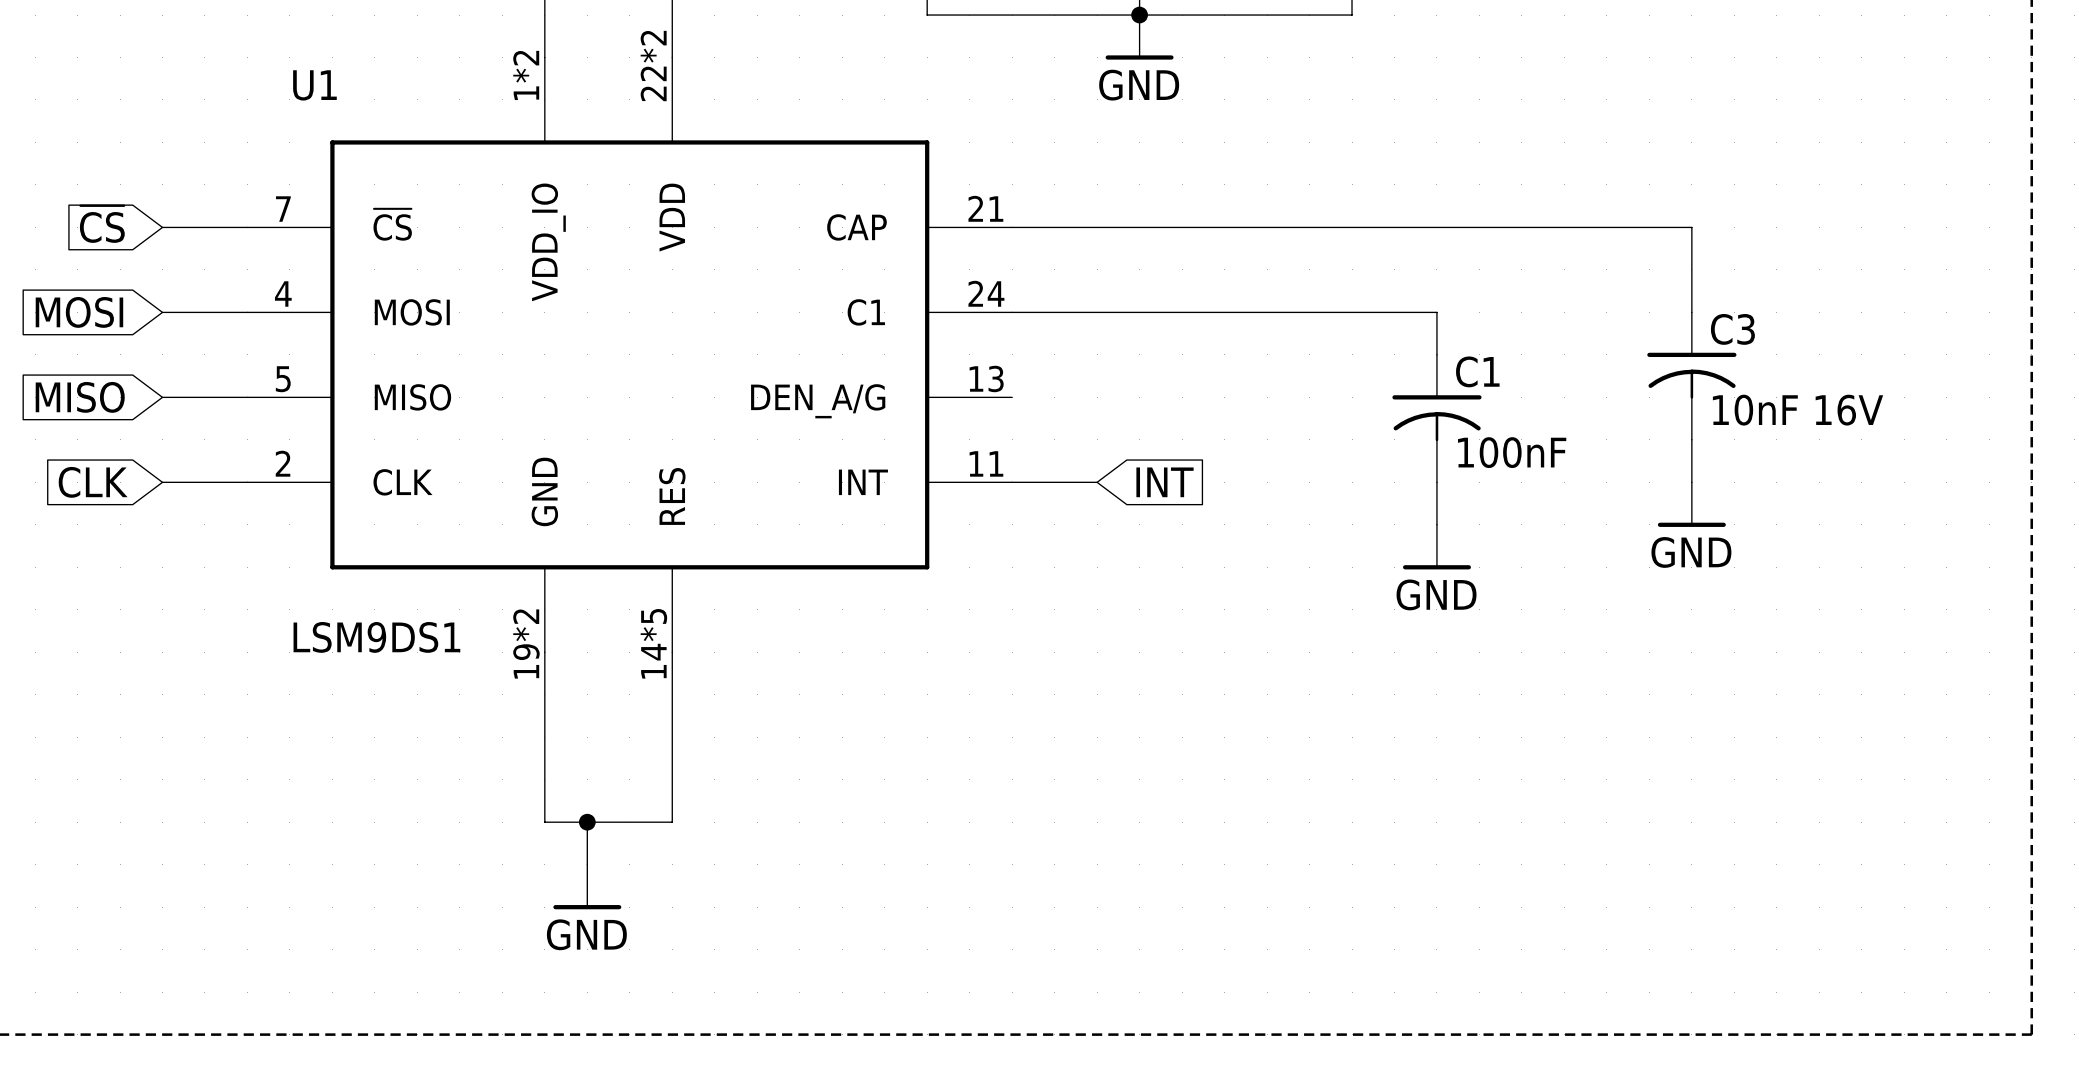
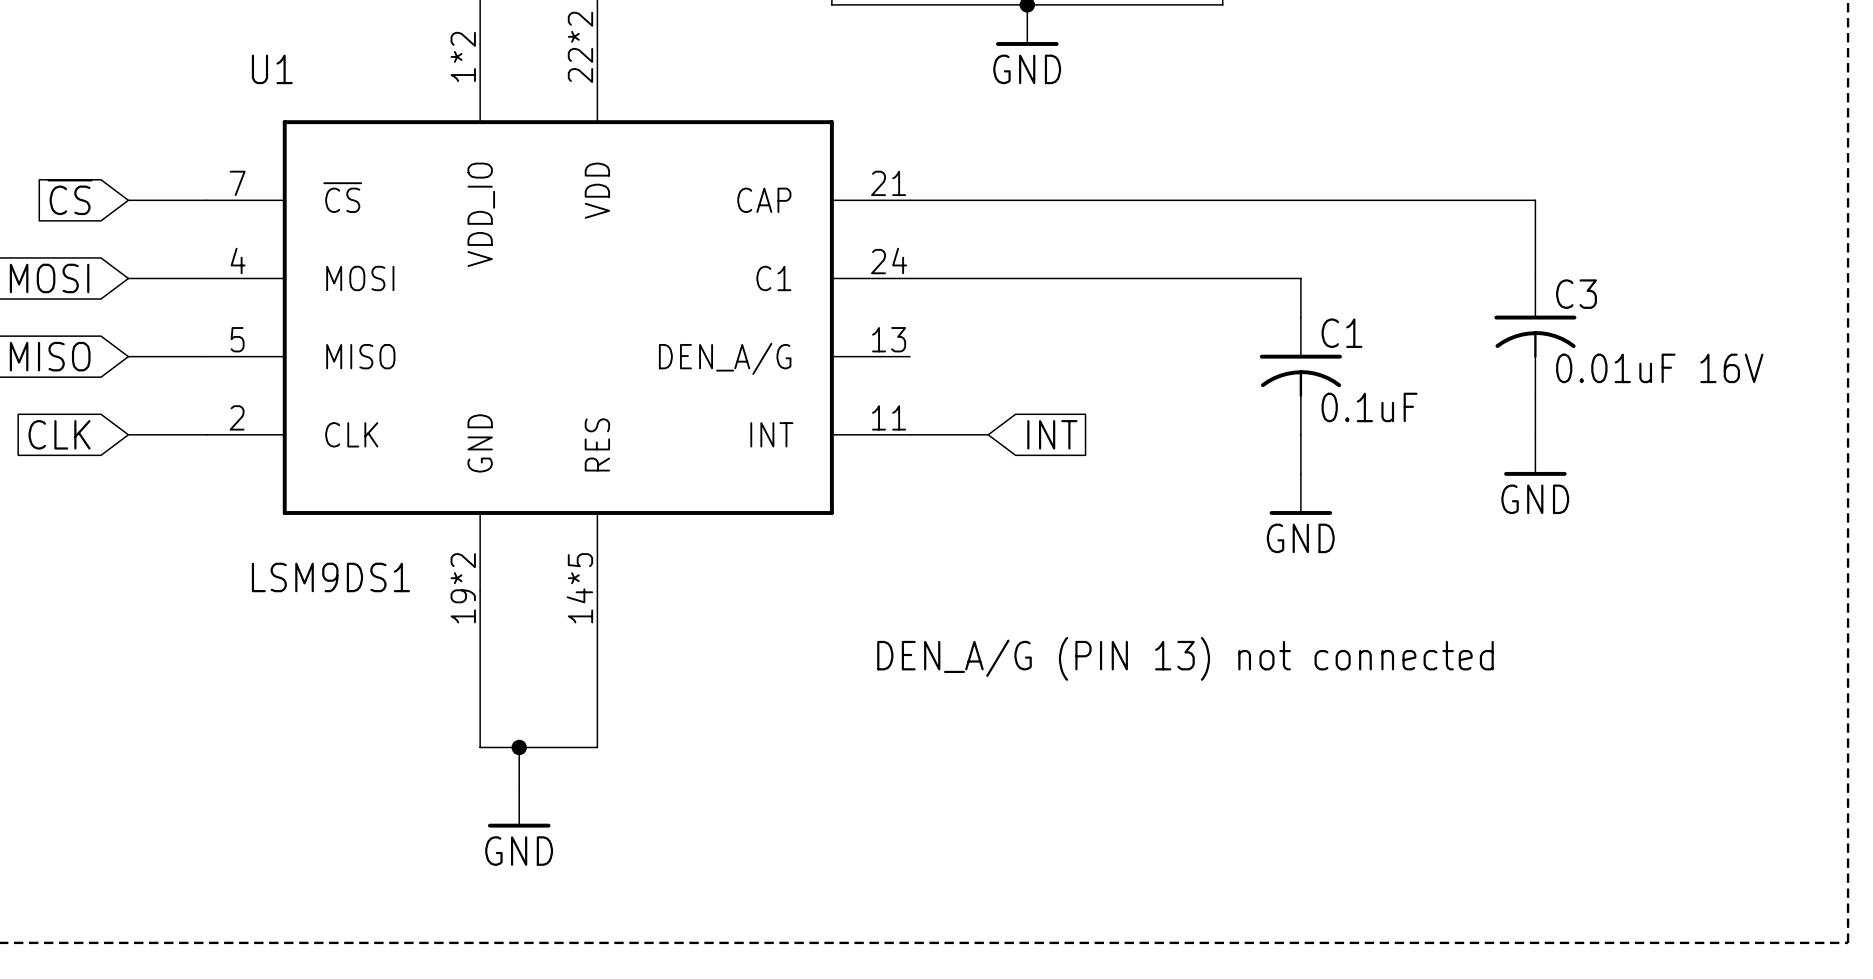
C3 value: 10nF 16V (1798, 410) -> 0.01uF 16V (1659, 368)
C1 value: 100nF (1512, 452) -> 0.1uF (1369, 407)
text: none -> DEN_A/G (PIN 13) not connected (1185, 658)

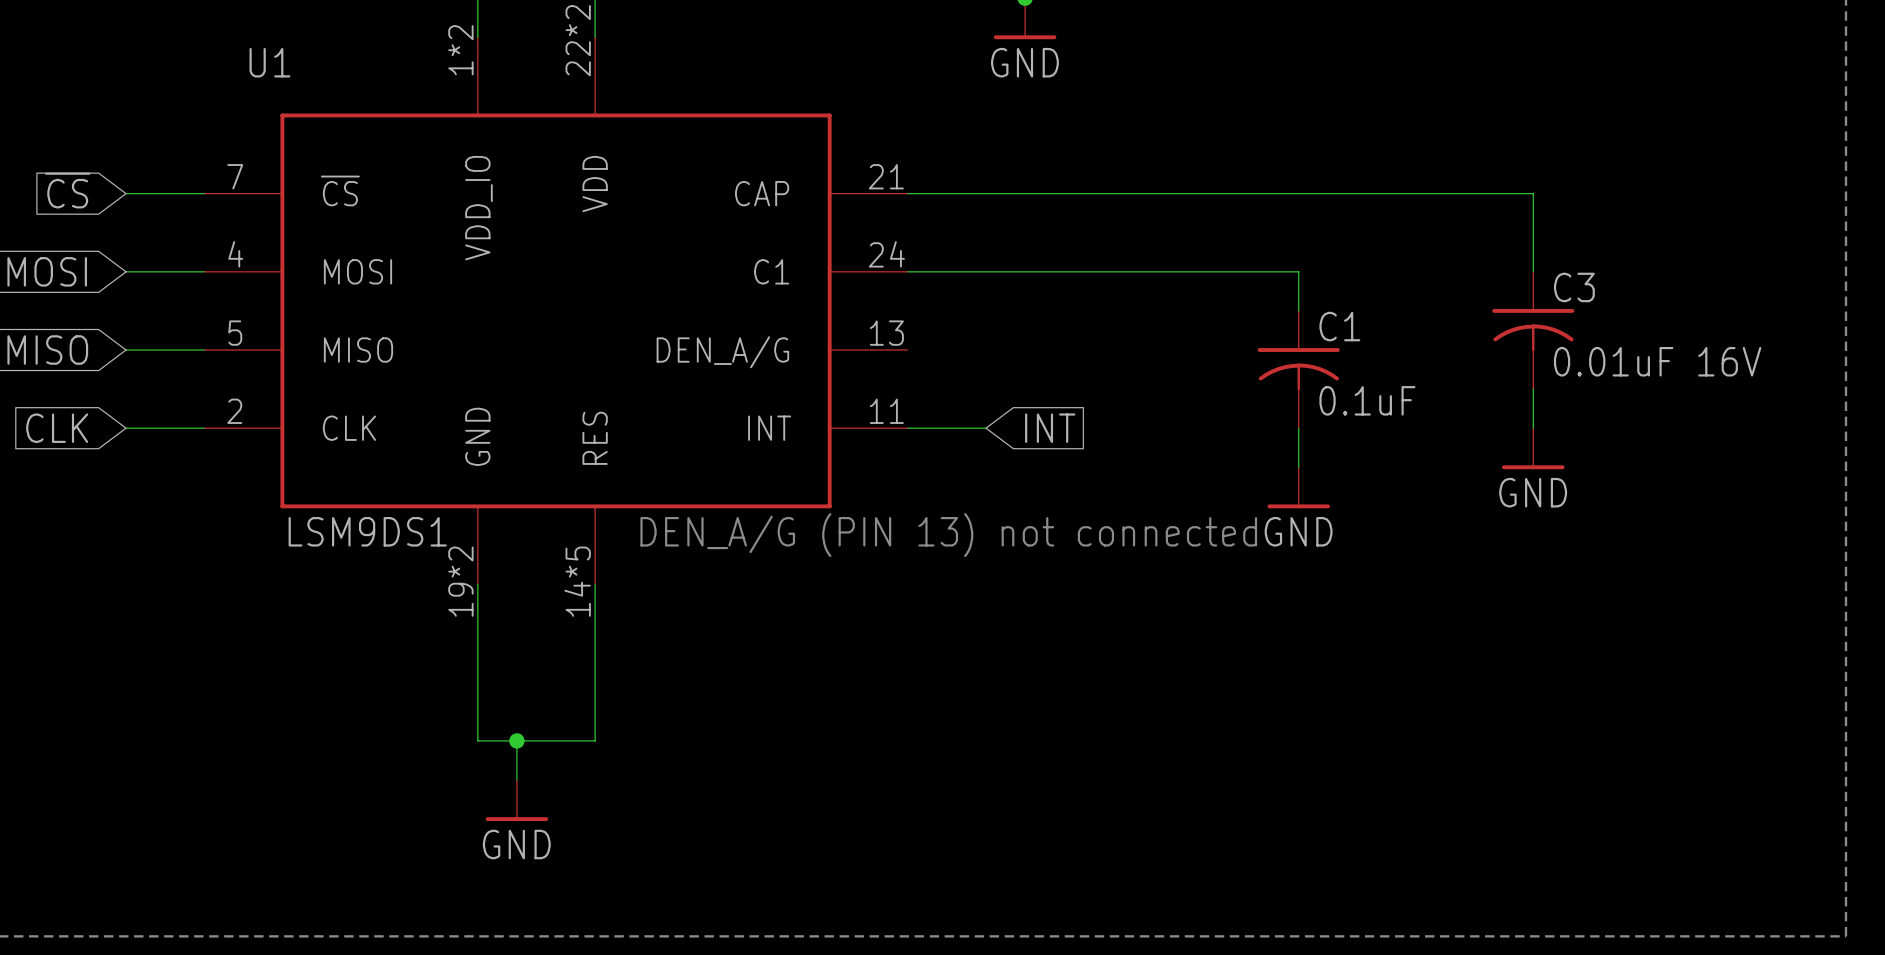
U1 value position: LSM9DS1 (330, 577) -> LSM9DS1 (367, 531)
text position: DEN_A/G (PIN 13) not connected (1185, 658) -> DEN_A/G (PIN 13) not connected (948, 535)

